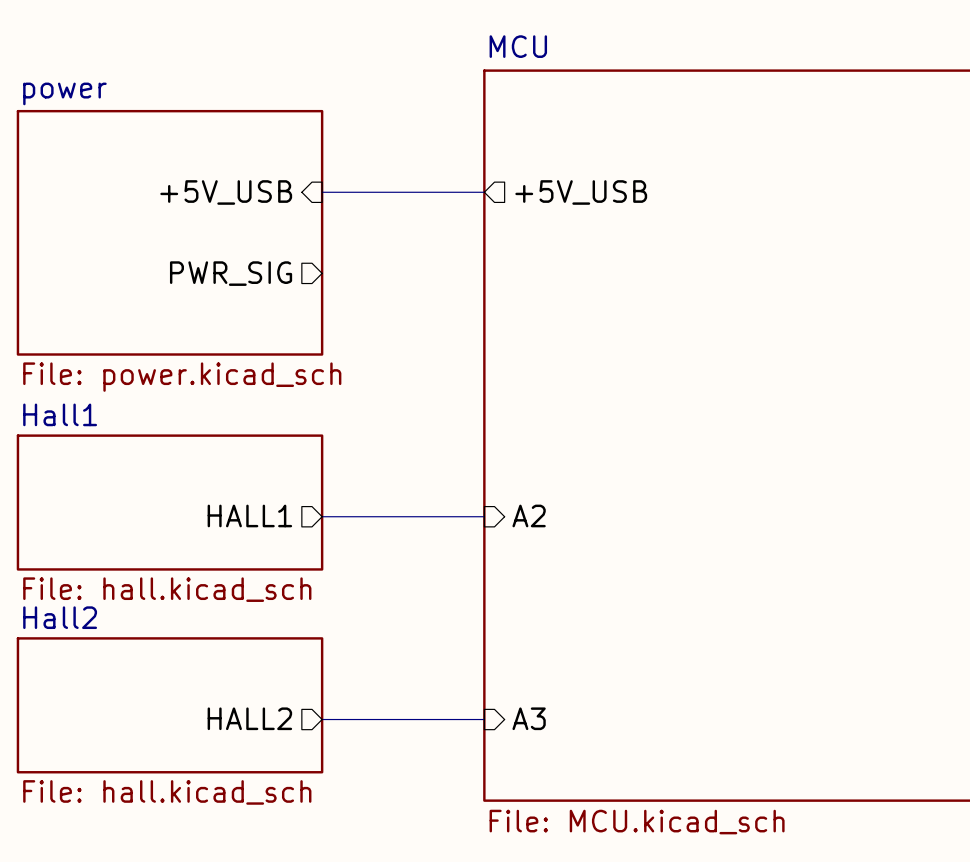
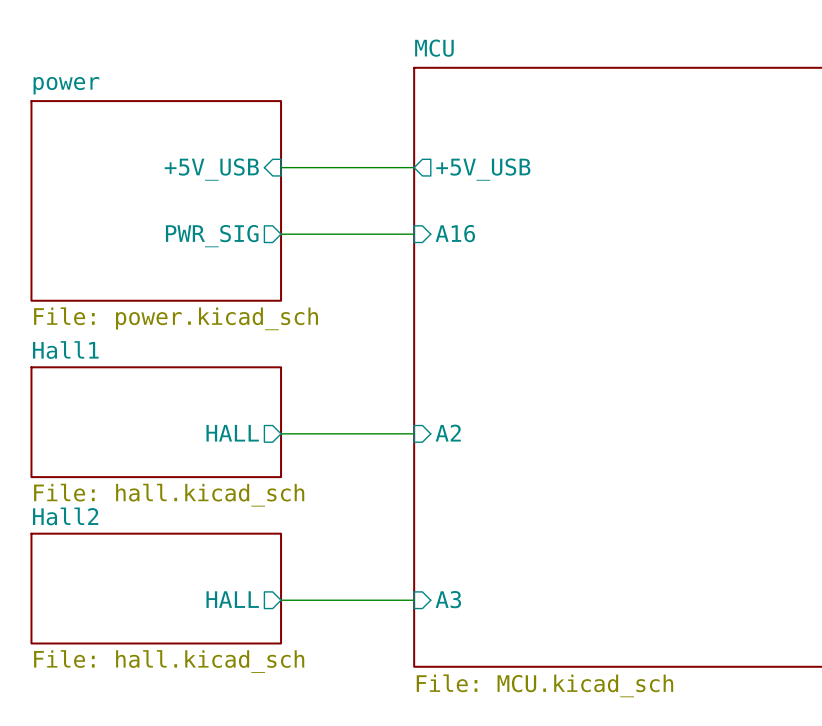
sheet pin: none -> A16 (455, 233)
wire: none -> (281, 234) (414, 234)
sheet pin: HALL1 (249, 515) -> HALL (232, 433)
sheet pin: HALL2 (249, 718) -> HALL (232, 599)

